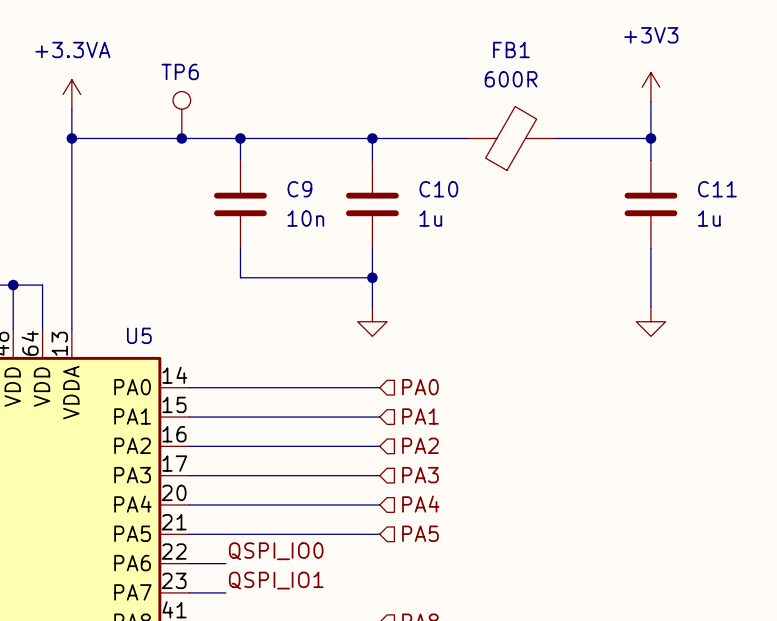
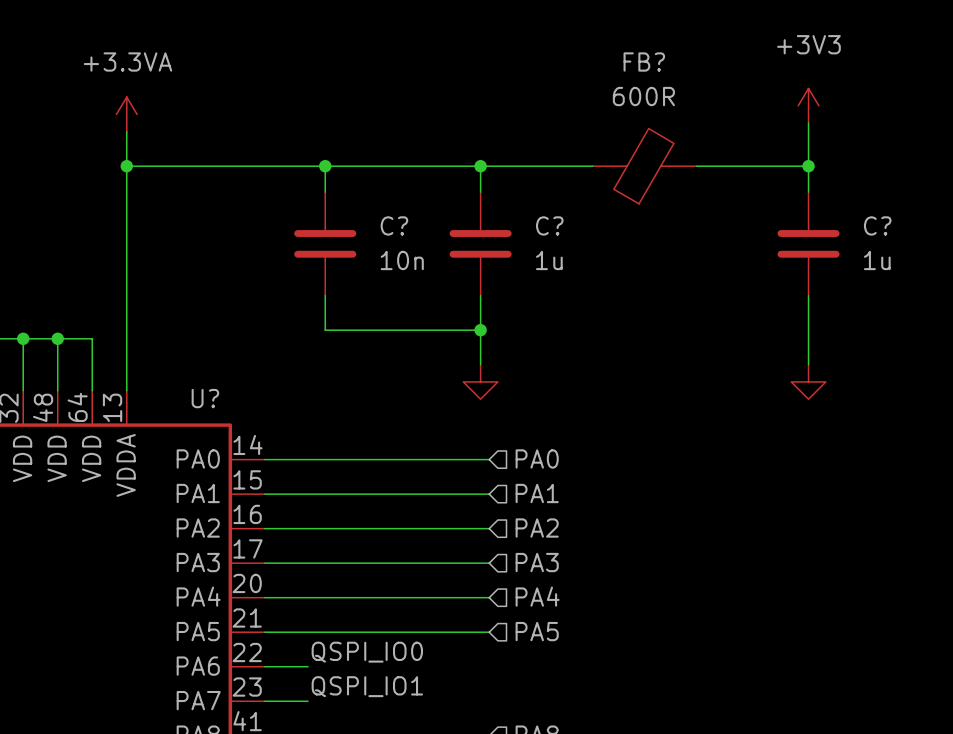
FB1 name: FB1 (511, 49) -> FB? (644, 62)
TP6: (181, 115) -> none
junction: (181, 138) -> none
C9 name: C9 (299, 189) -> C? (394, 225)
C10 name: C10 (438, 189) -> C? (549, 225)
C11 name: C11 (717, 189) -> C? (877, 225)
U5 name: U5 (139, 335) -> U? (205, 398)

